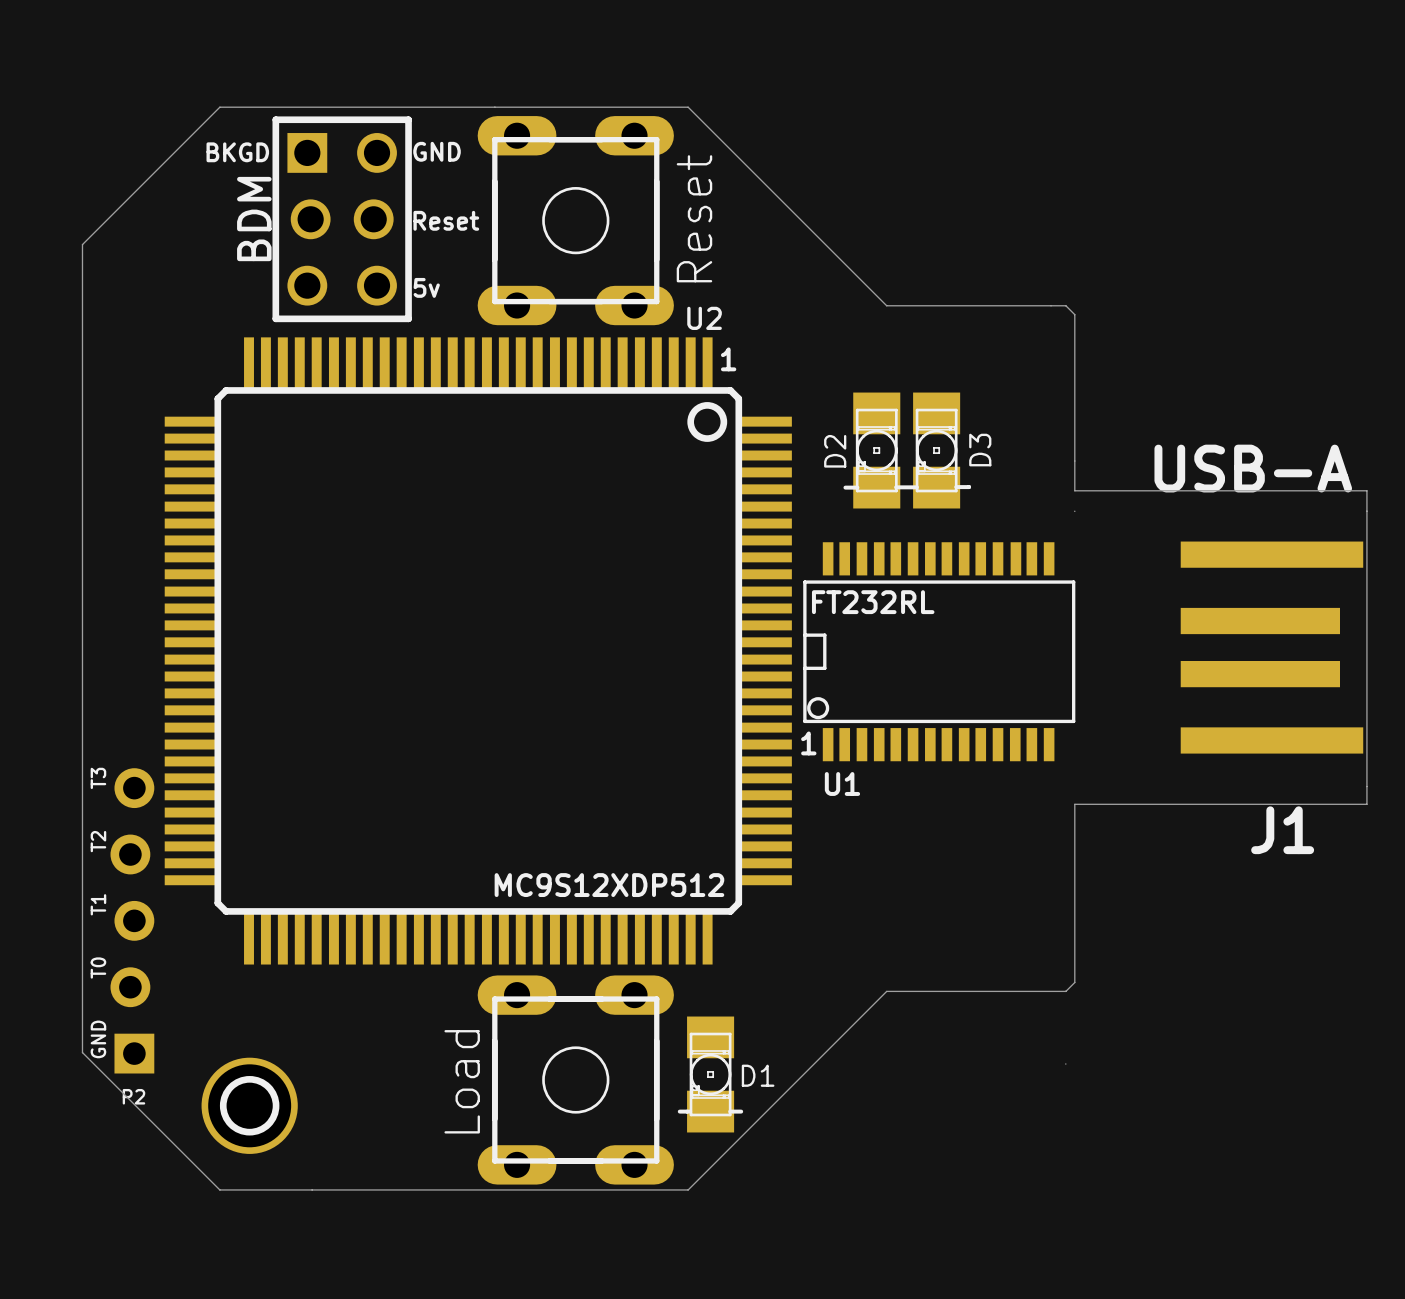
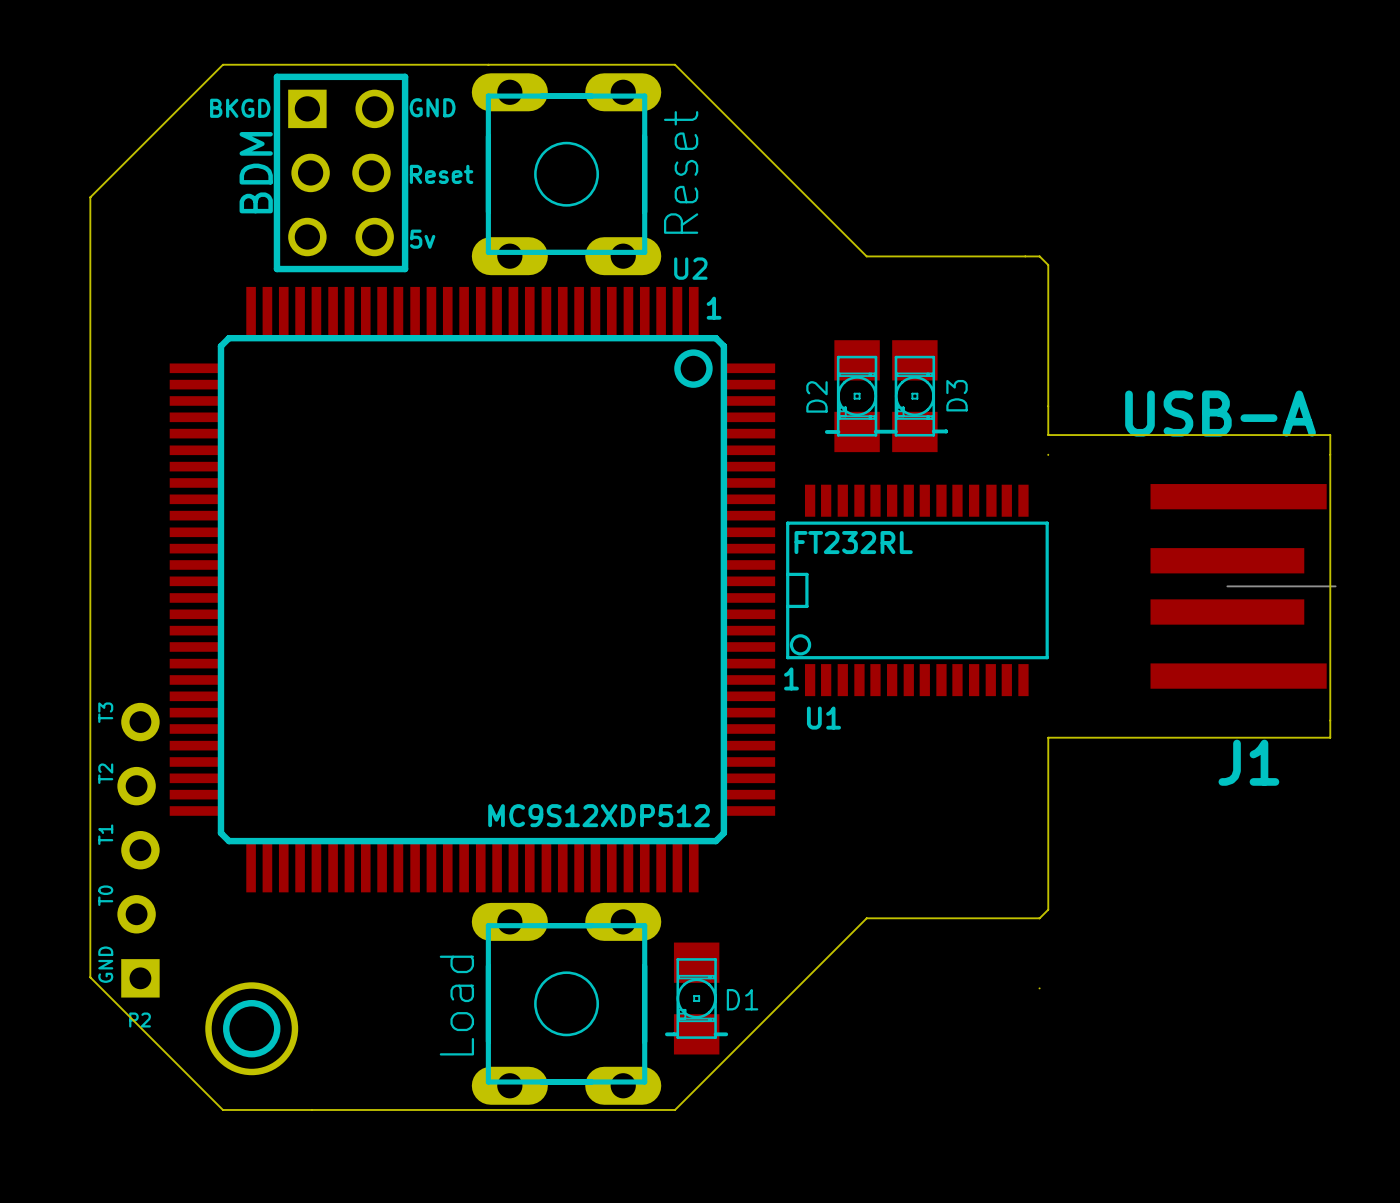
line: none -> (1227, 586) (1335, 586)

